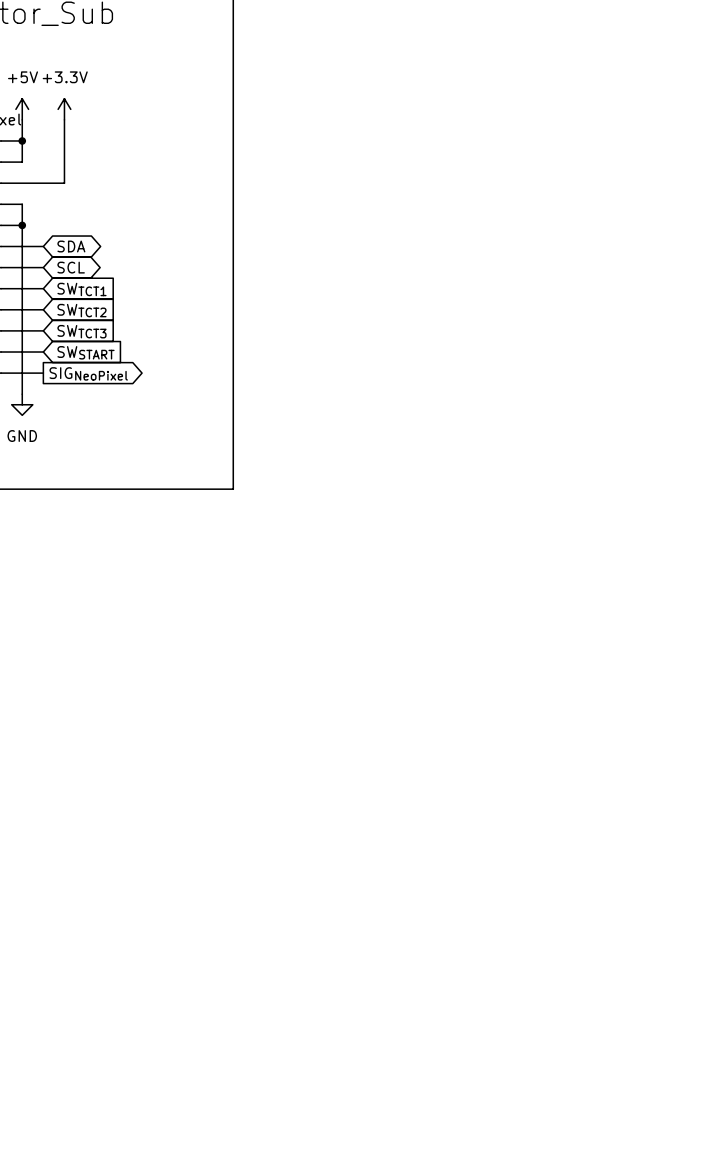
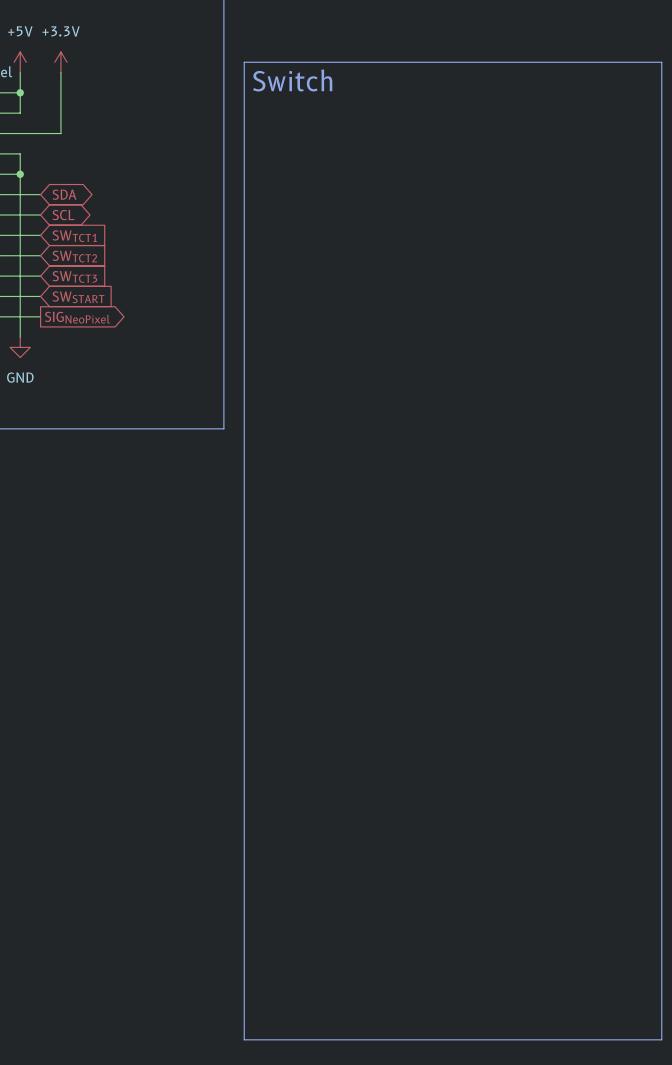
line: none -> (244, 62) (661, 62) (661, 1039) (244, 1039) (244, 62)
text: none -> Switch (292, 80)

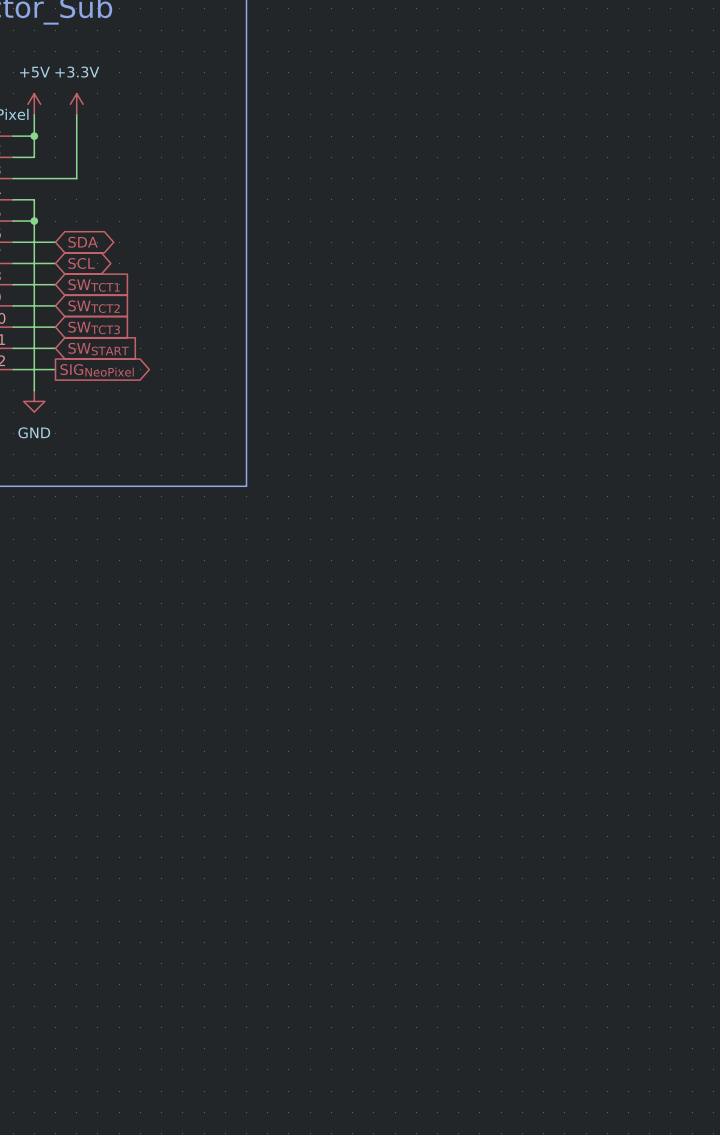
line: (244, 62) (661, 62) (661, 1039) (244, 1039) (244, 62) -> none
text: Switch (292, 80) -> none

